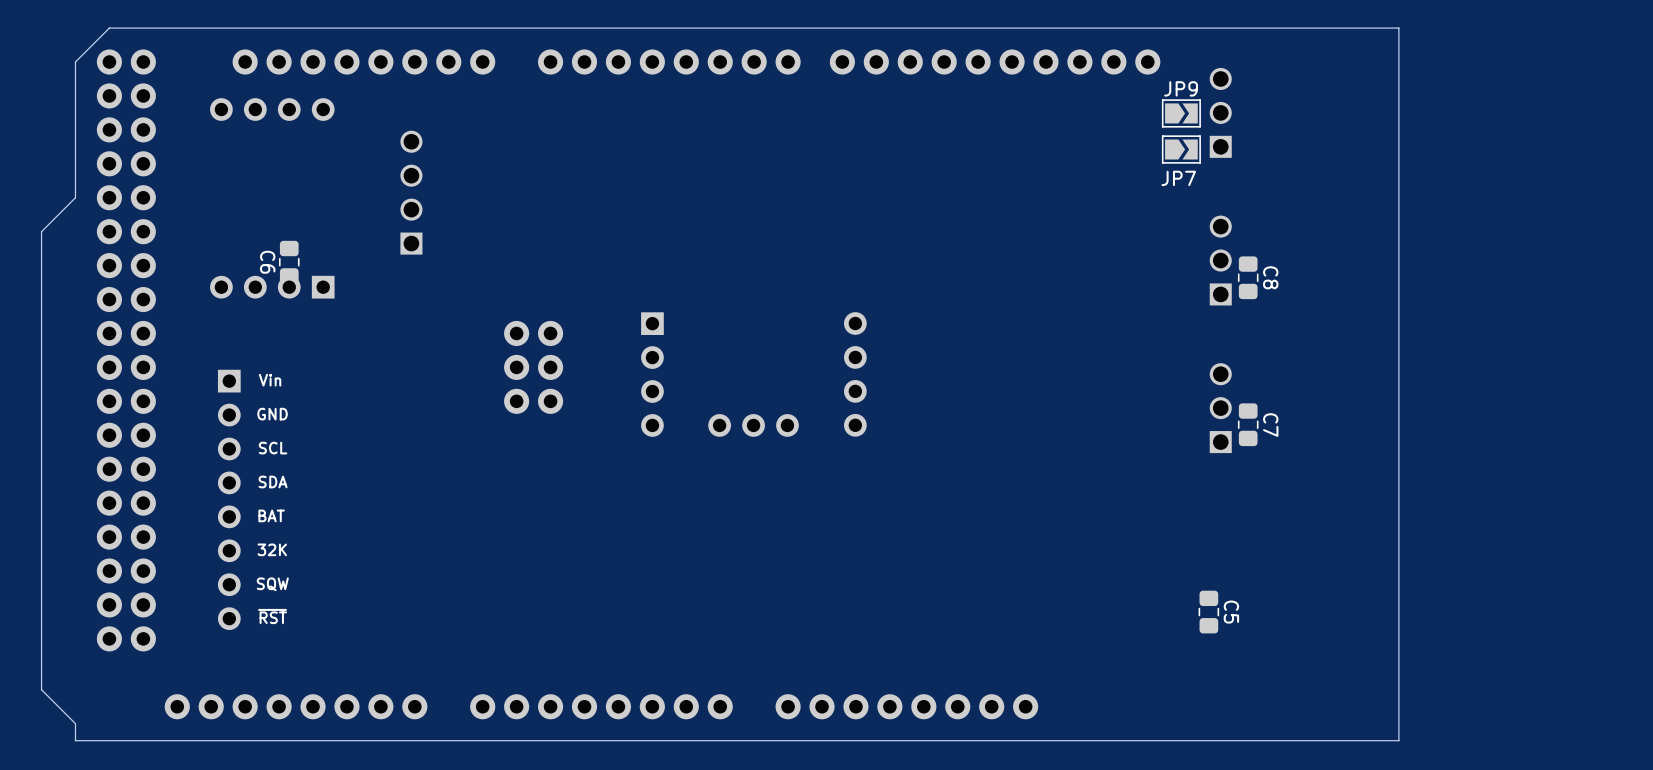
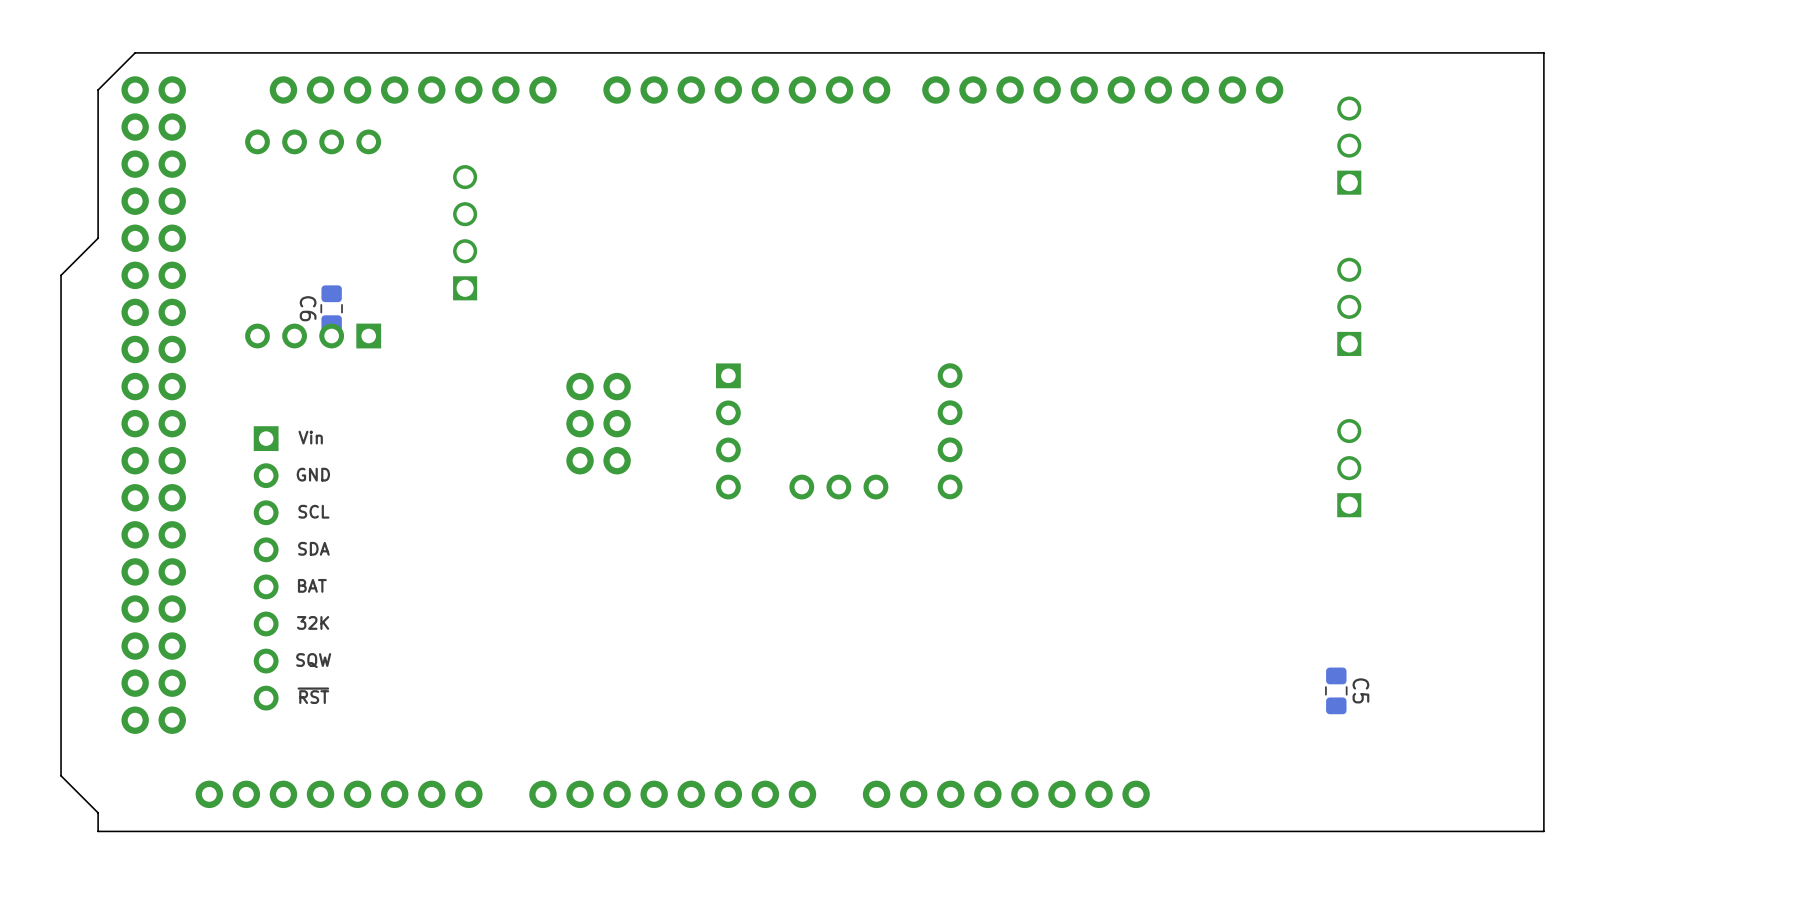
JP9: (1181, 113) -> none
JP7: (1181, 149) -> none
C8: (1248, 277) -> none
C7: (1248, 424) -> none

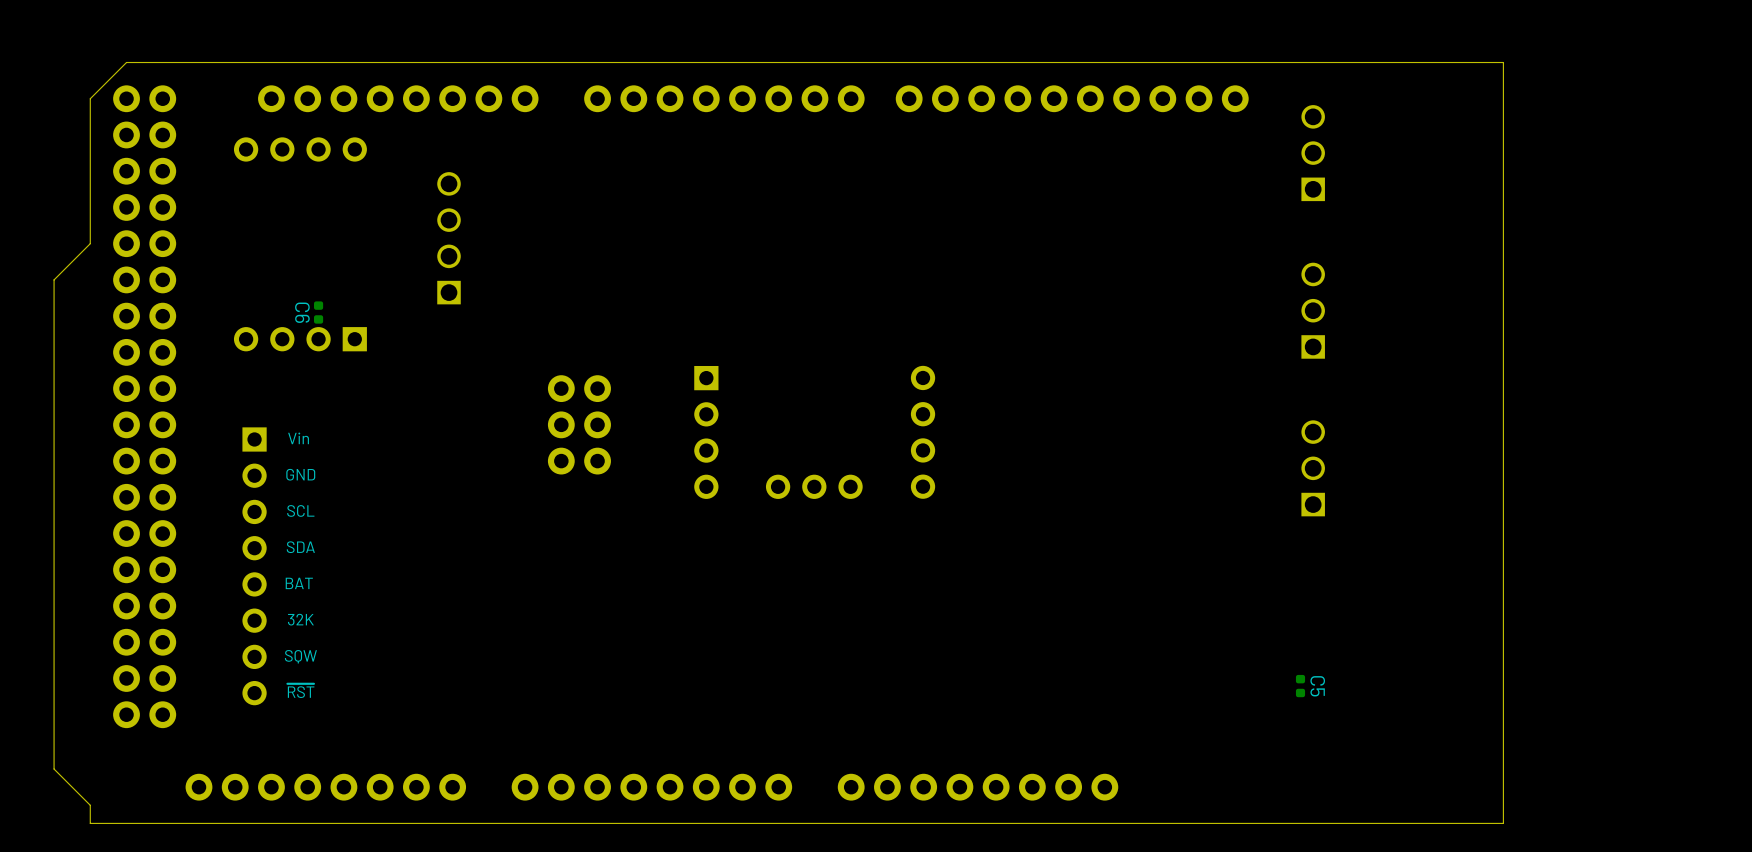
C6 footprint: [320, 285, 343, 333] -> [314, 301, 324, 324]
C5 footprint: [1325, 667, 1348, 715] -> [1295, 674, 1306, 698]

